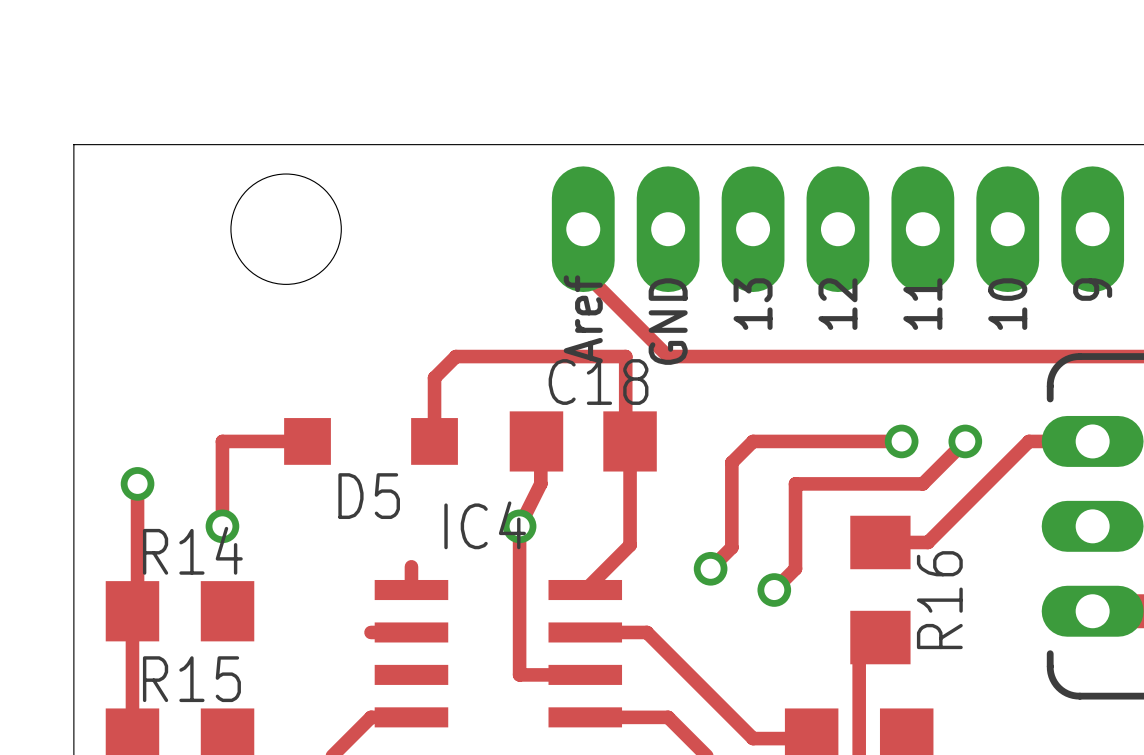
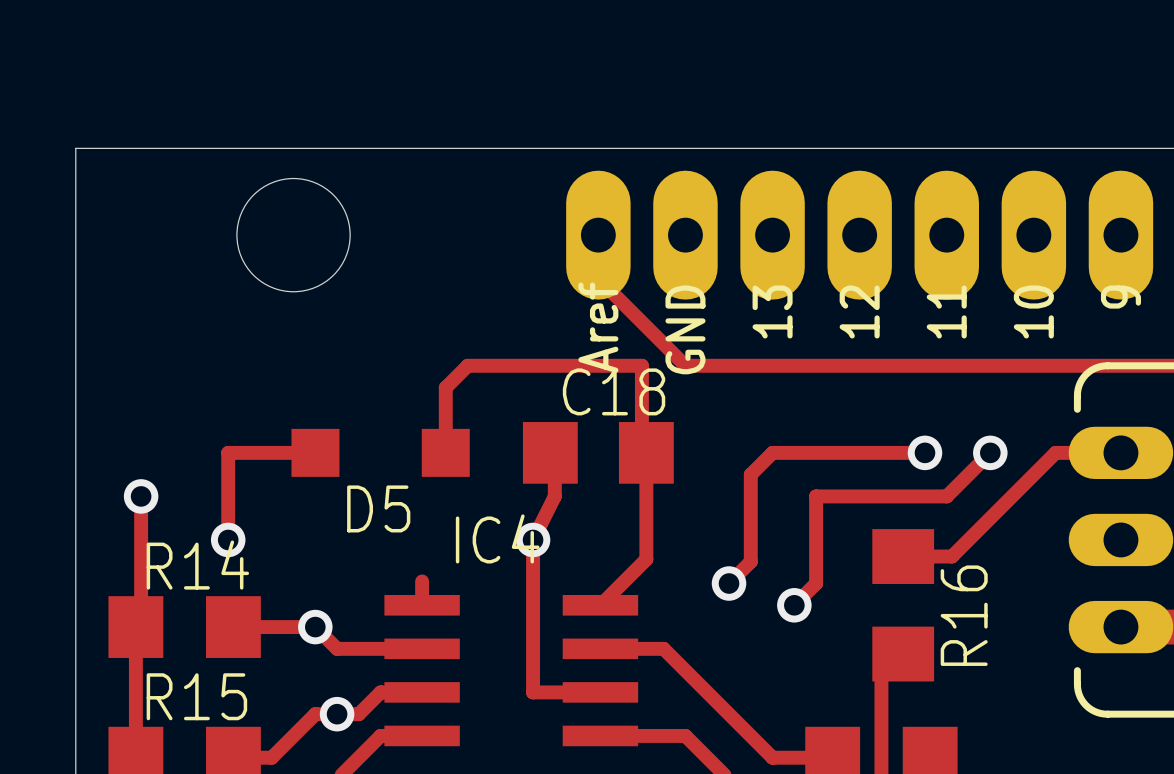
track: none -> (249, 627) (315, 627) (337, 648) (380, 648)
via: none -> (315, 627)
track: none -> (402, 692) (380, 692) (358, 714) (315, 714) (271, 757) (249, 757)
via: none -> (337, 714)

